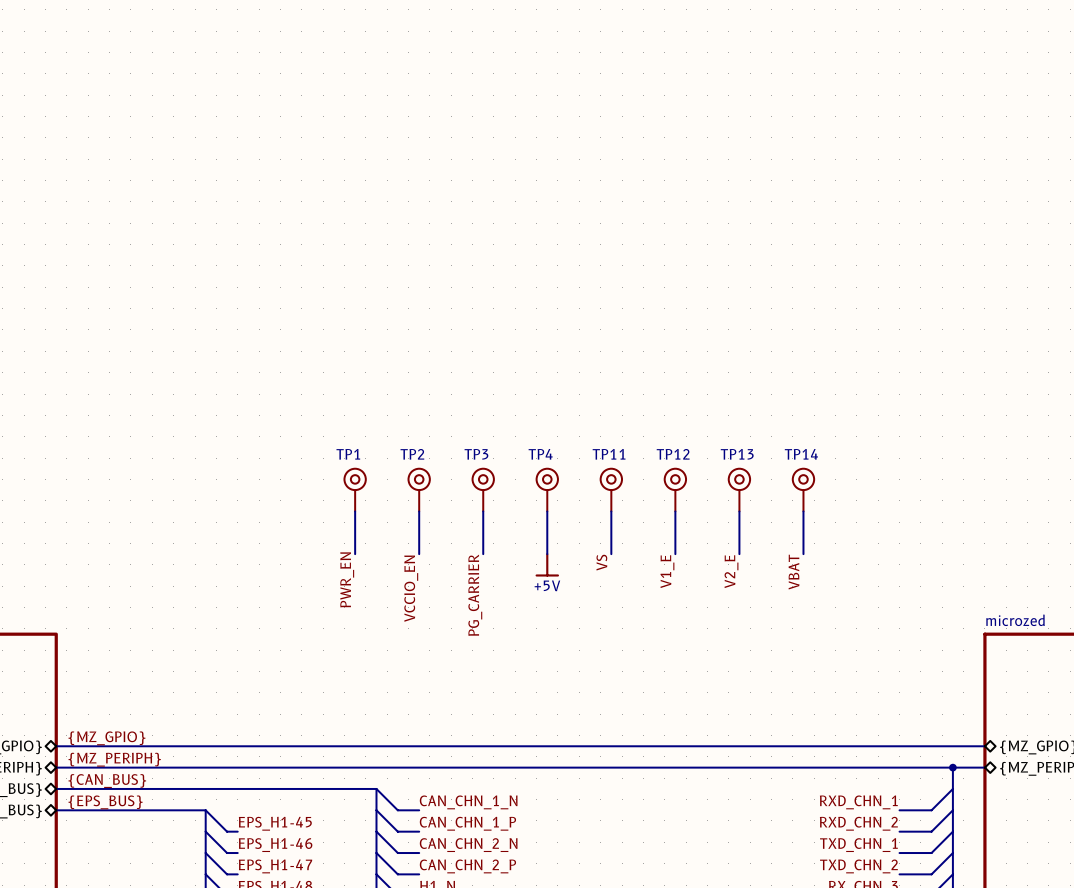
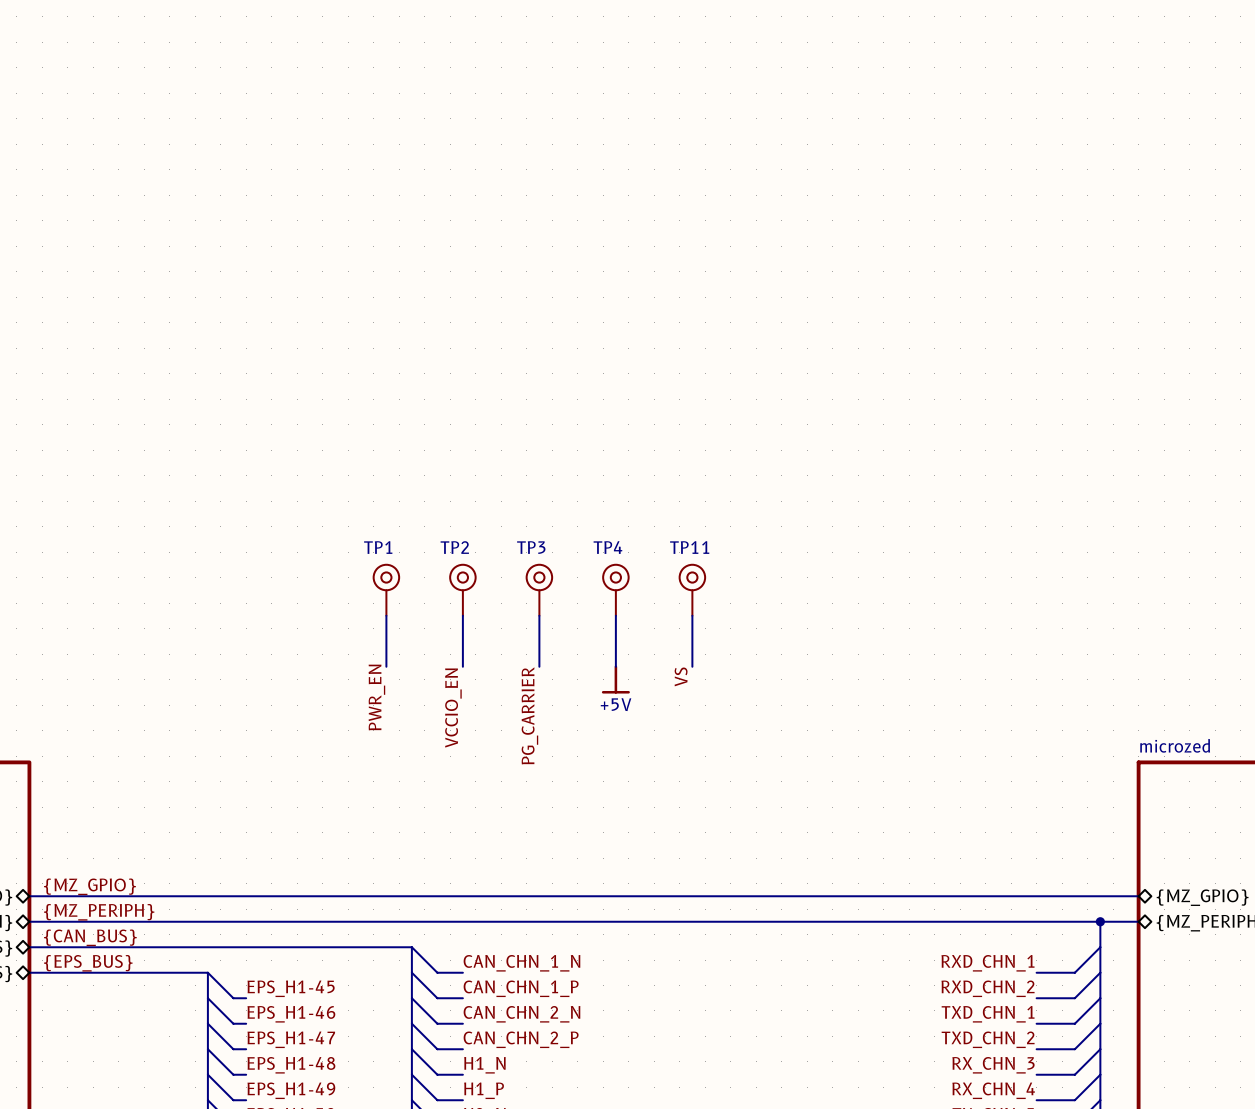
TP12: (675, 490) -> none
TP13: (739, 490) -> none
TP14: (803, 490) -> none
wire: (675, 511) (675, 554) -> none
wire: (739, 511) (739, 554) -> none
wire: (803, 511) (803, 554) -> none
label: V1_E (667, 571) -> none
label: V2_E (731, 571) -> none
label: VBAT (794, 572) -> none

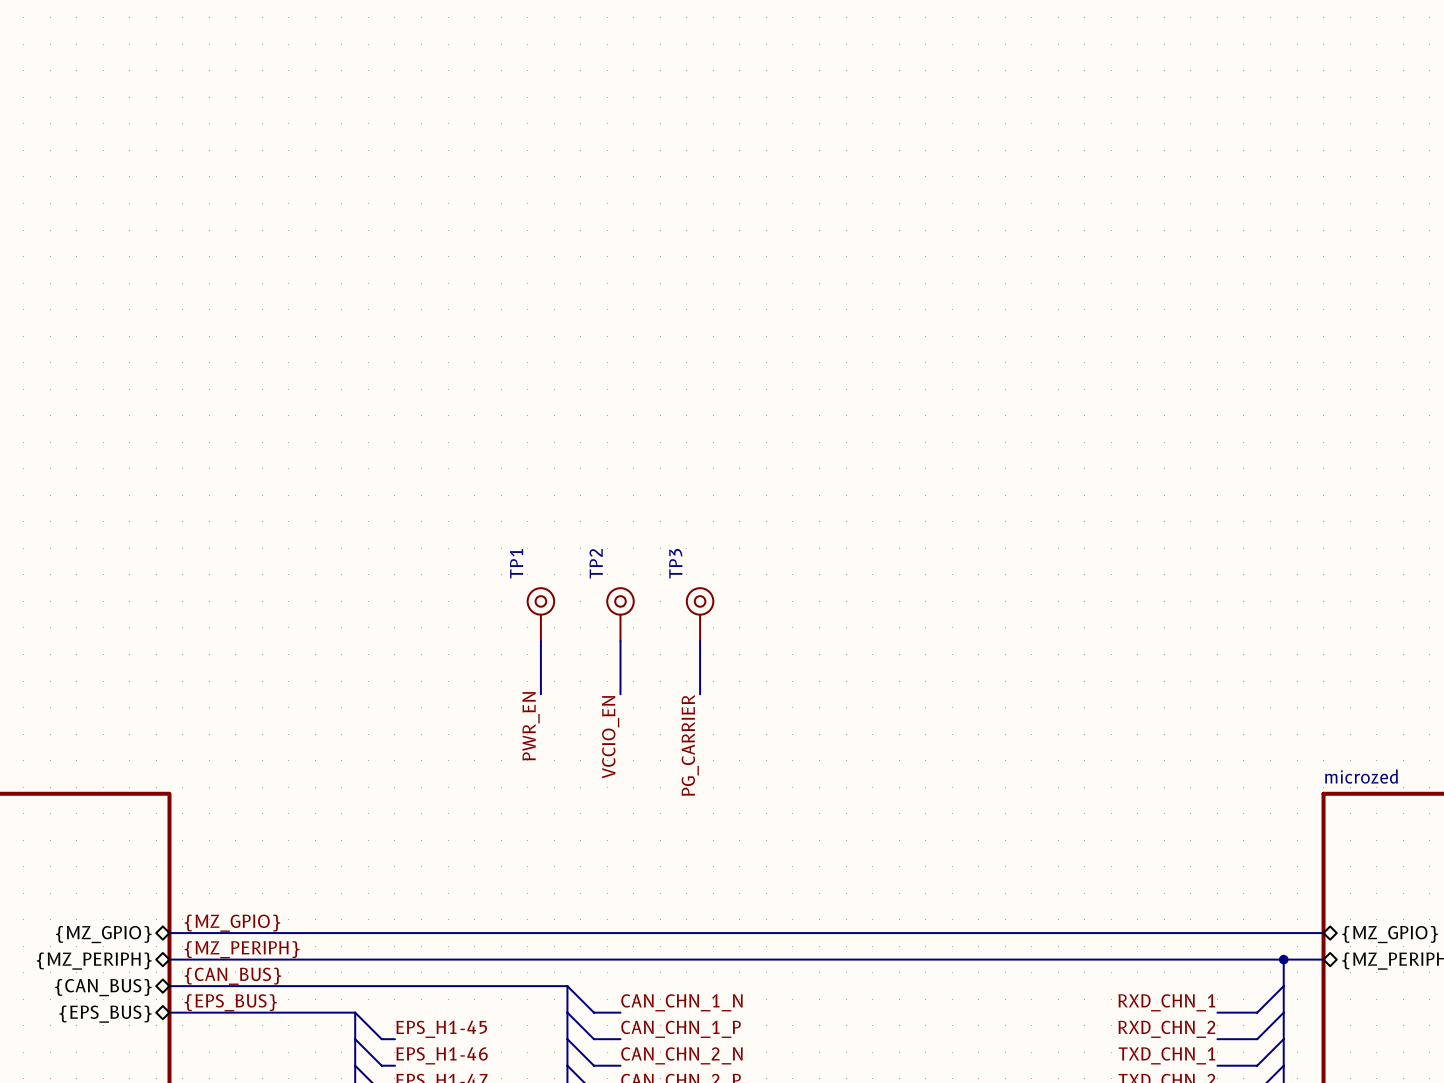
TP1 name rotation: 0° (378, 547) -> 90° counterclockwise (516, 563)
TP2 name rotation: 0° (454, 547) -> 90° counterclockwise (596, 563)
TP3 name rotation: 0° (531, 547) -> 90° counterclockwise (675, 563)
TP4: (615, 590) -> none
TP11: (692, 590) -> none
wire: (615, 615) (615, 666) -> none
wire: (692, 615) (692, 666) -> none
label: VS (681, 676) -> none
power symbol: +5V (615, 679) -> none

